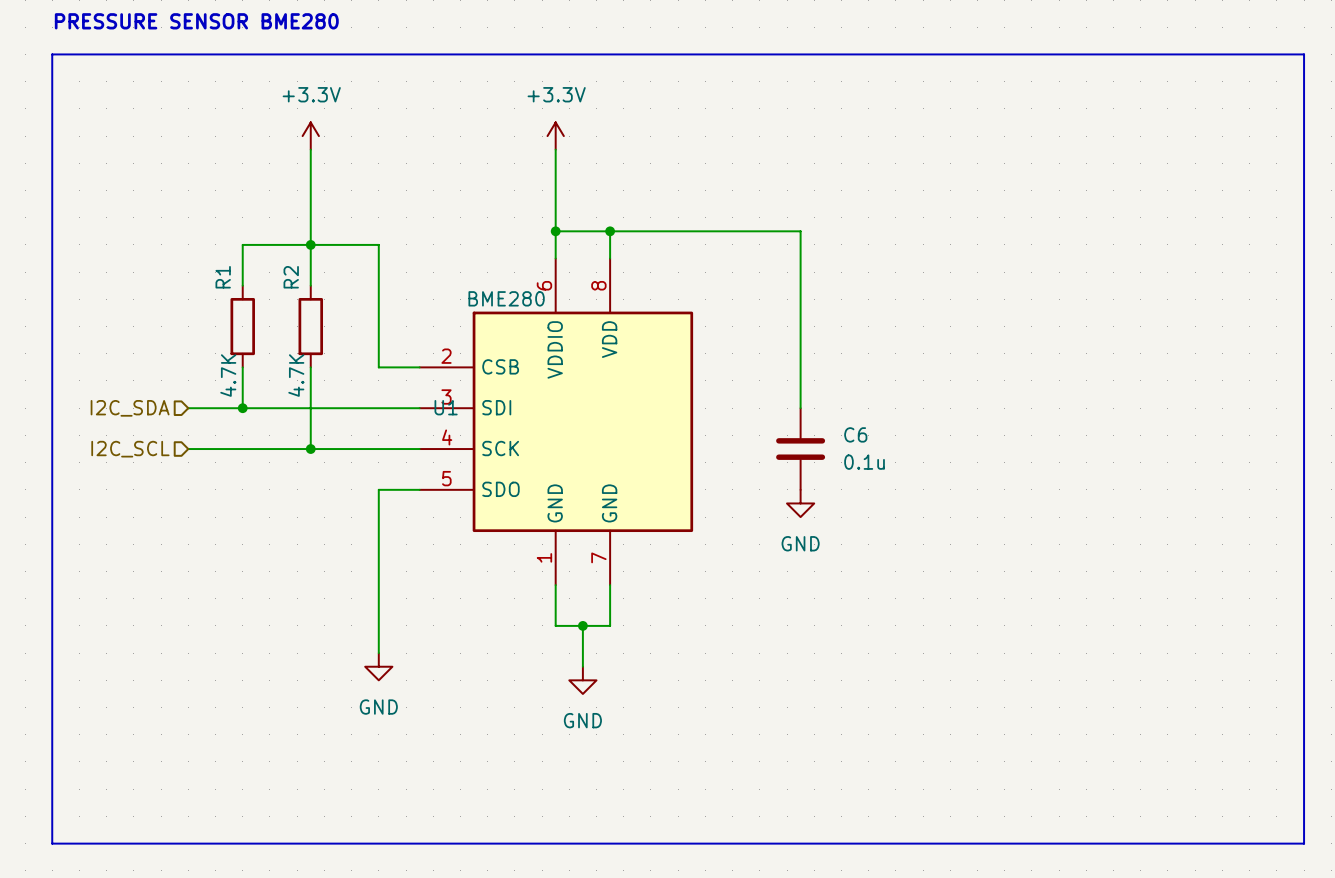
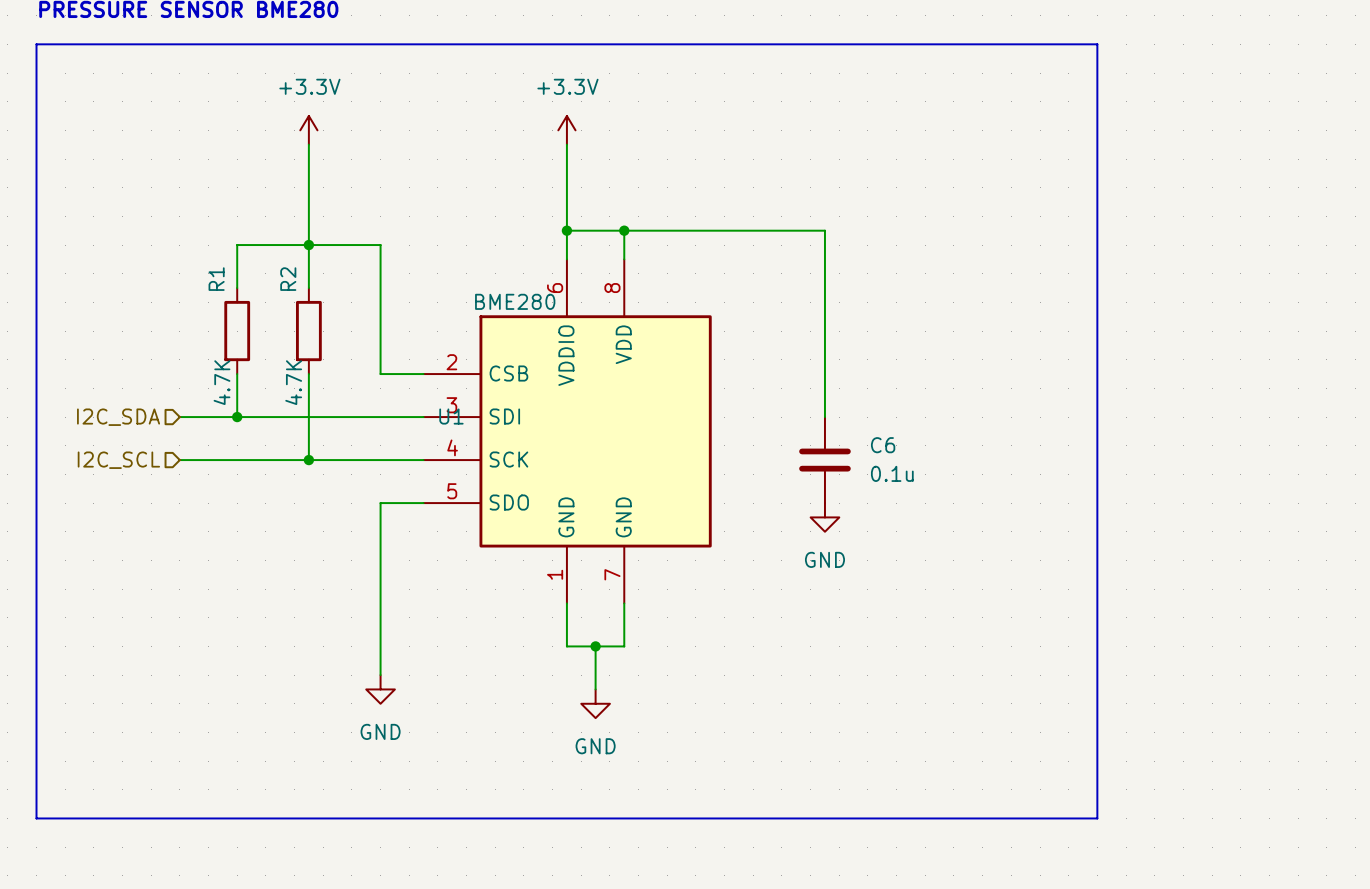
line: (1059, 54) (1304, 54) (1304, 843) (52, 843) (52, 789) -> (1097, 44) (1097, 818) (36, 818)

